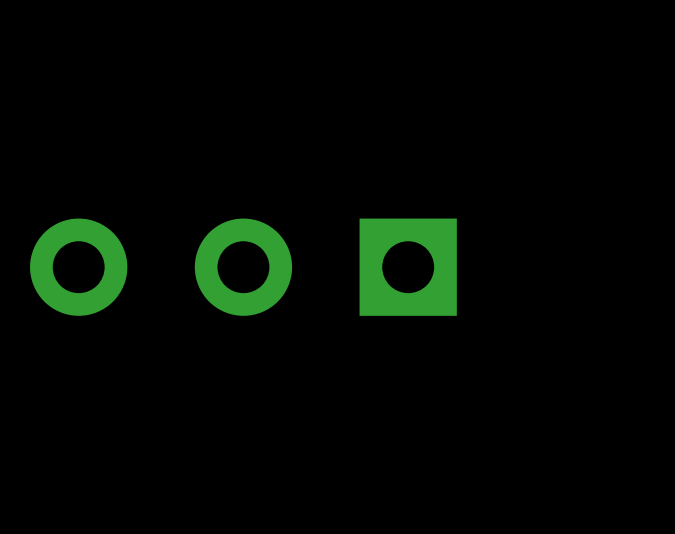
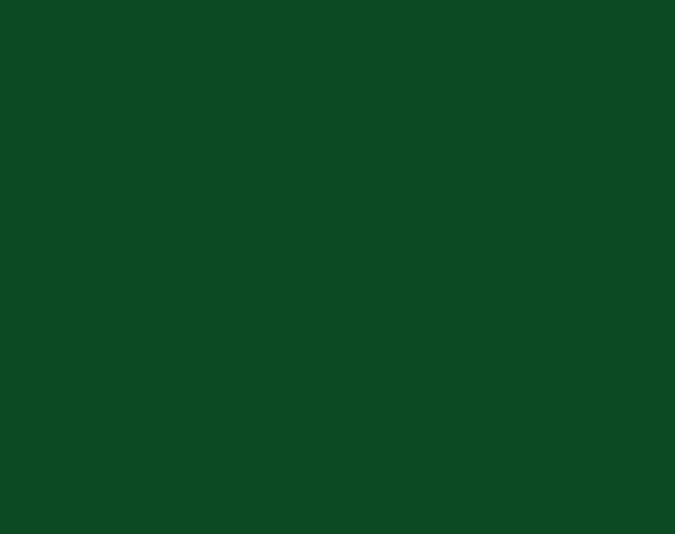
part: (243, 267) -> none

